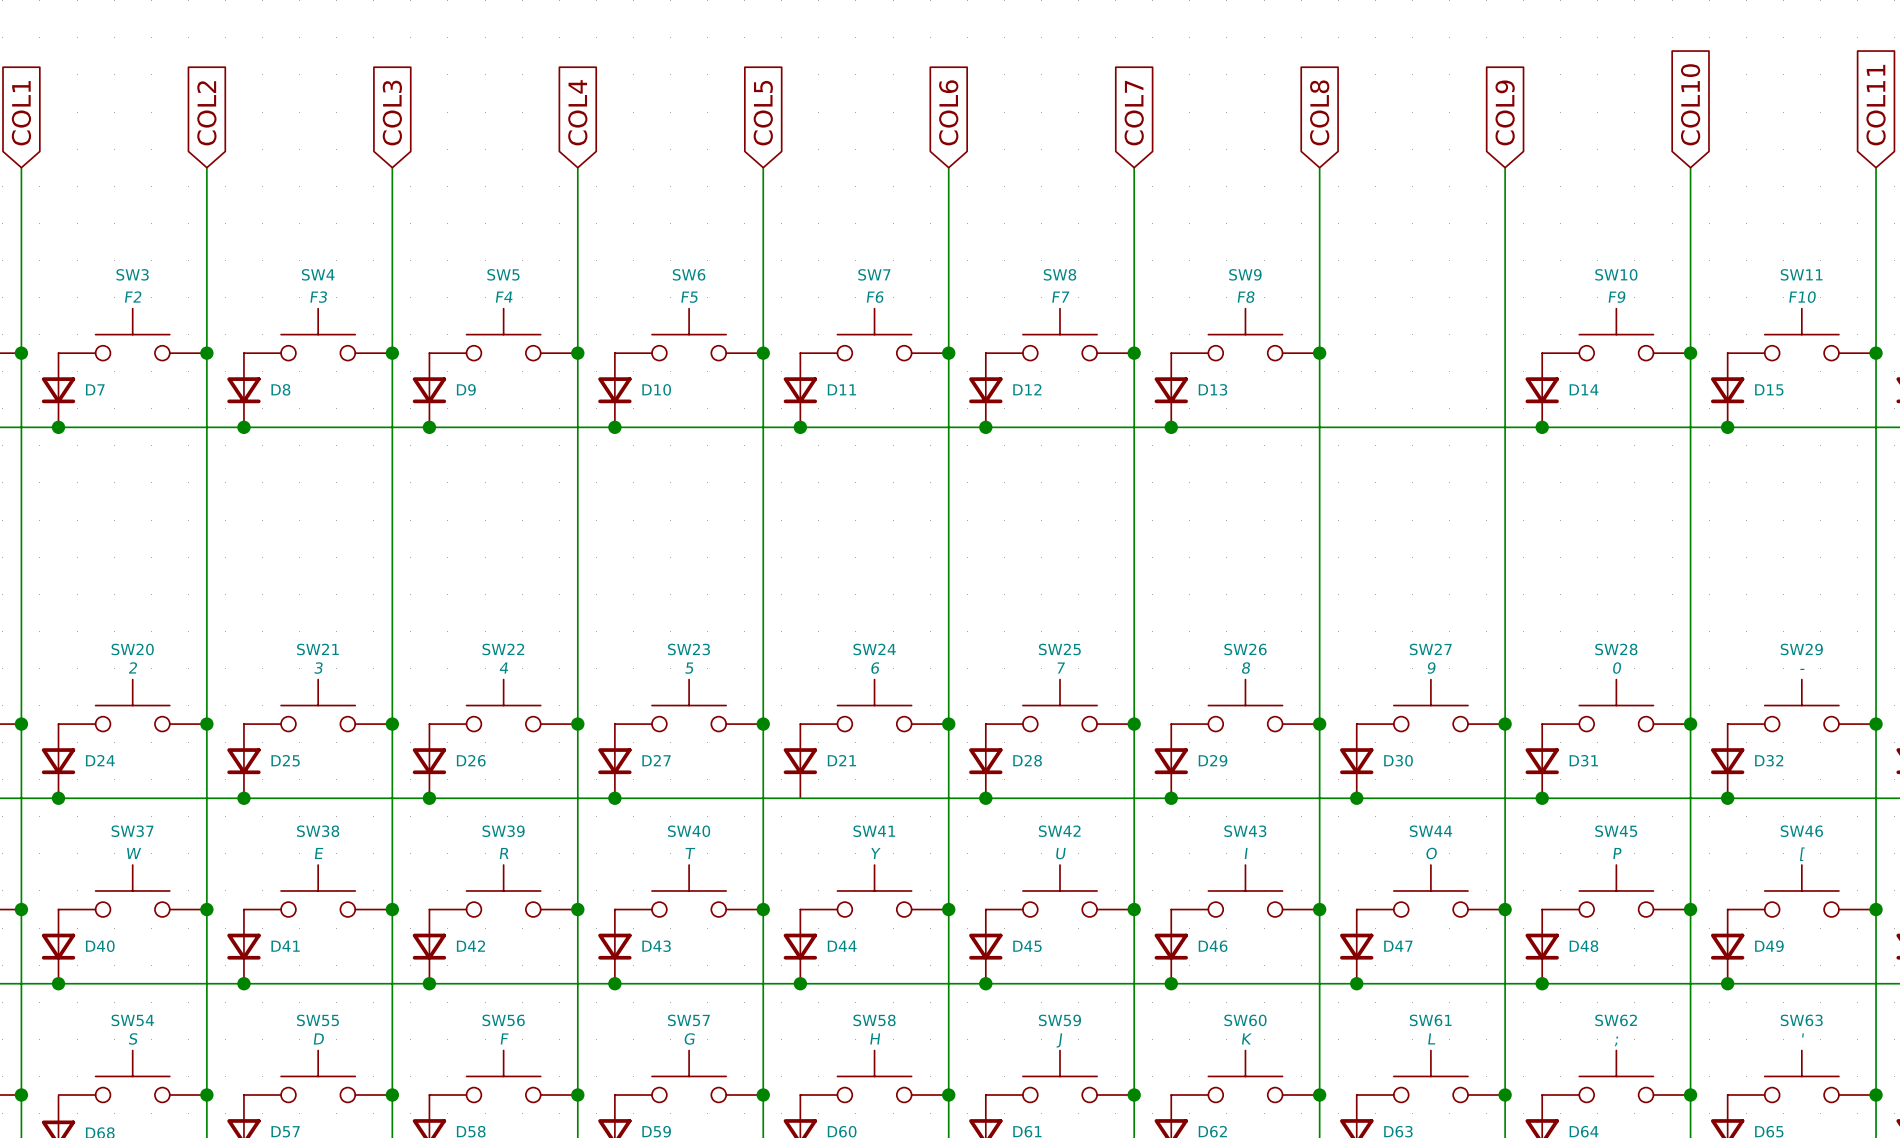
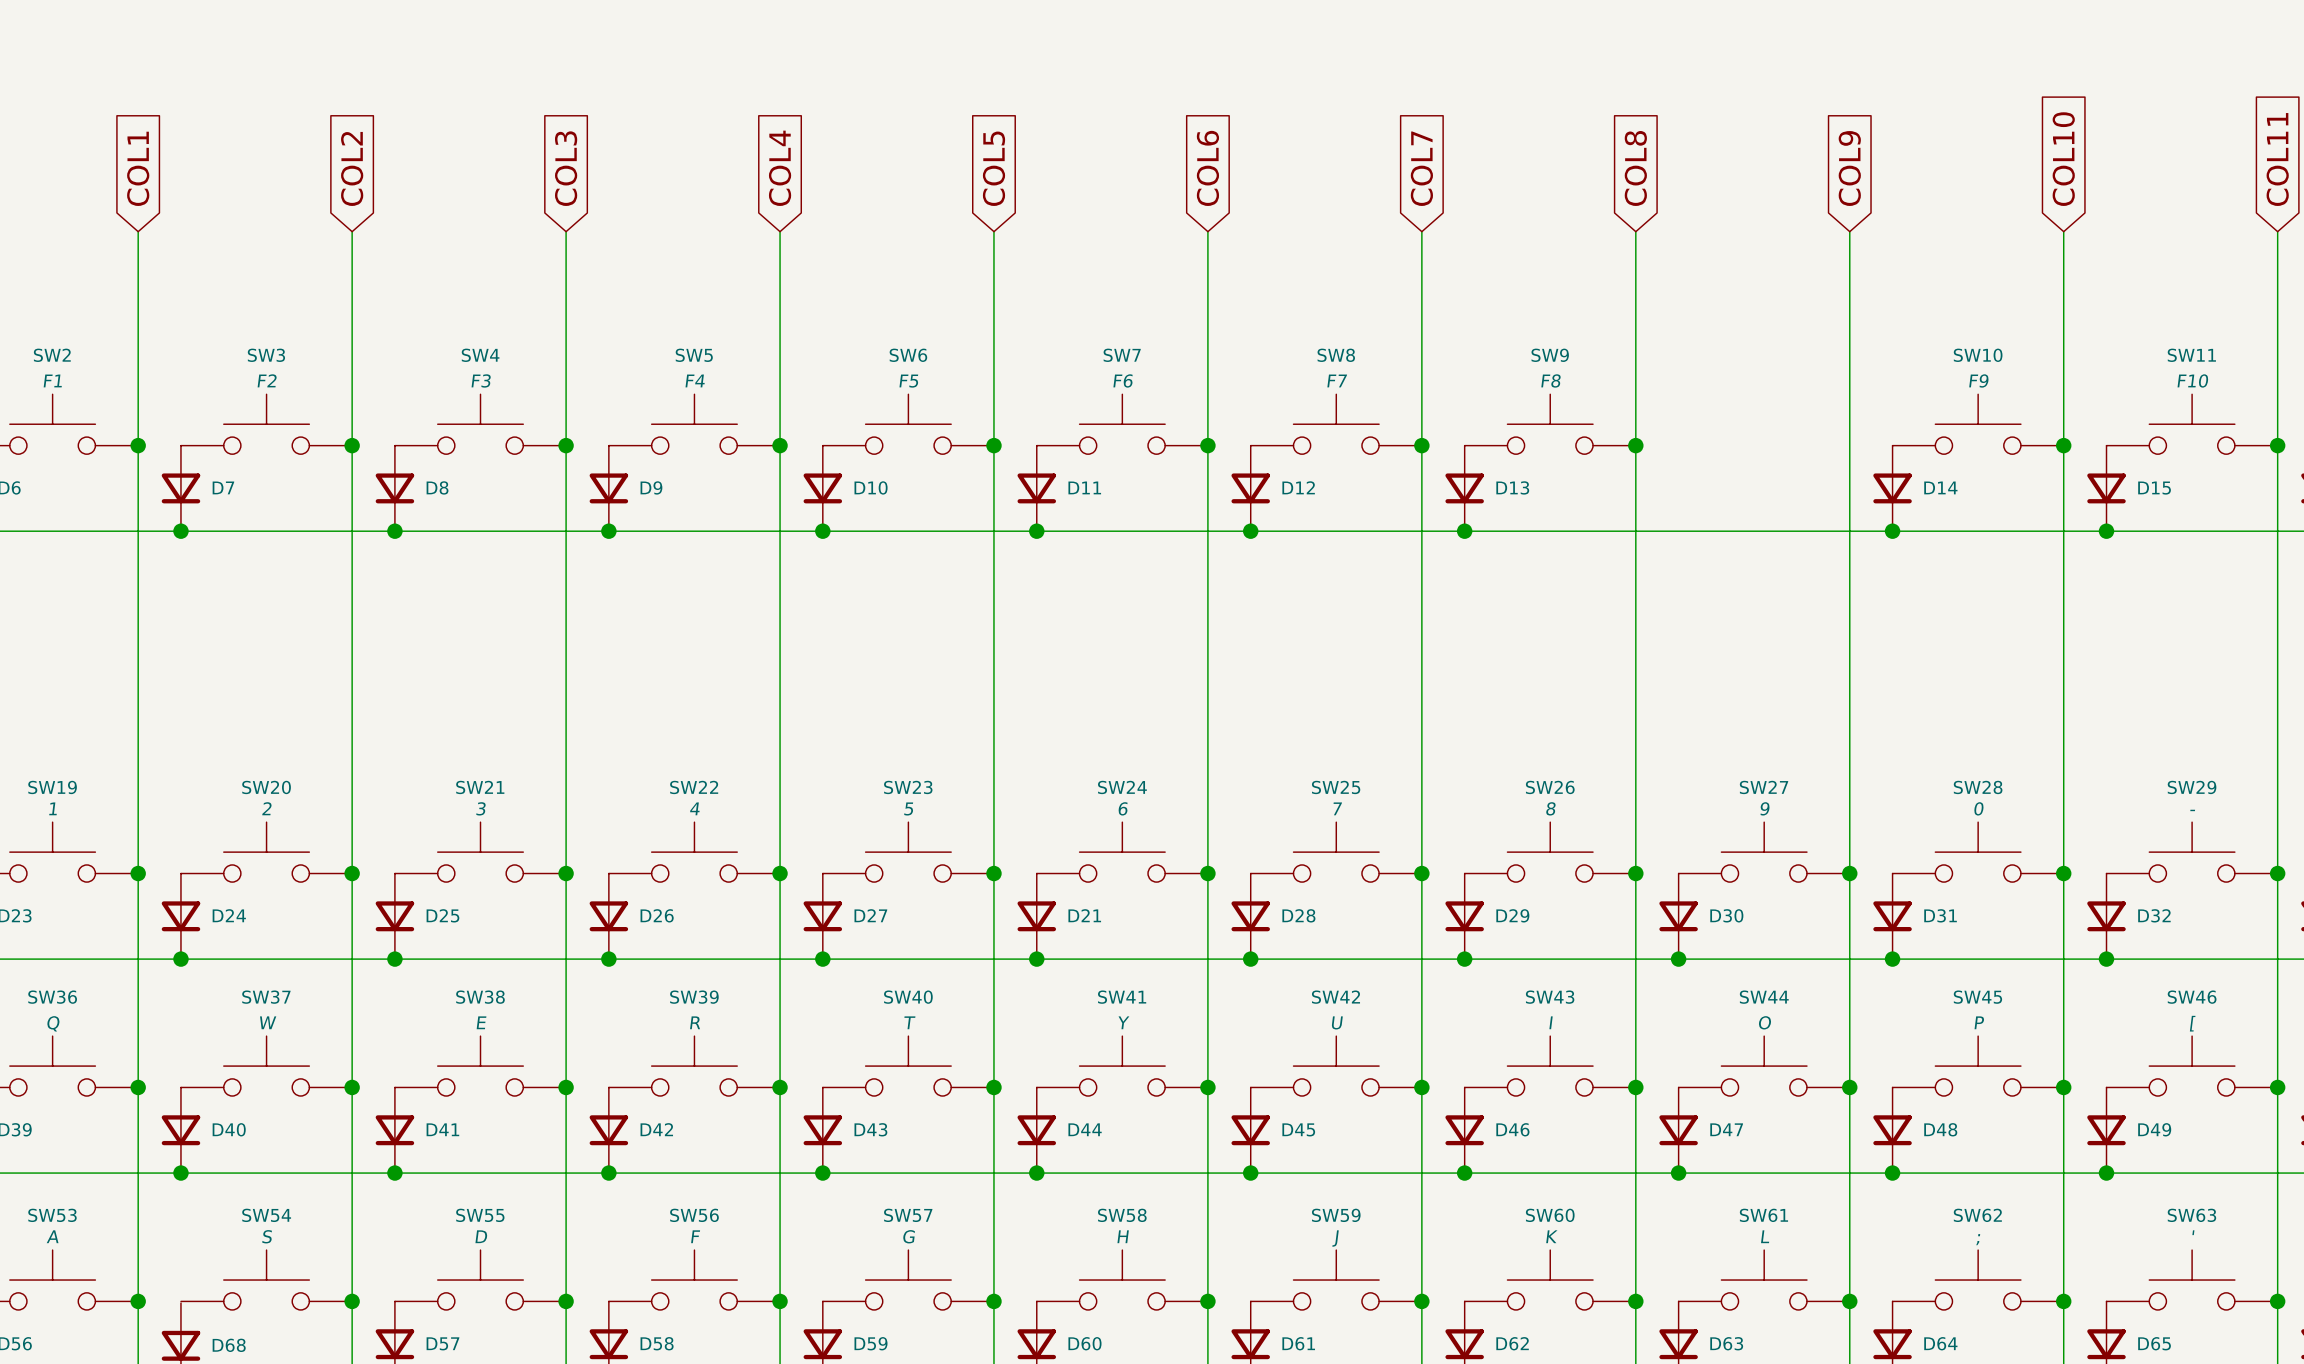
junction: none -> (1036, 959)

